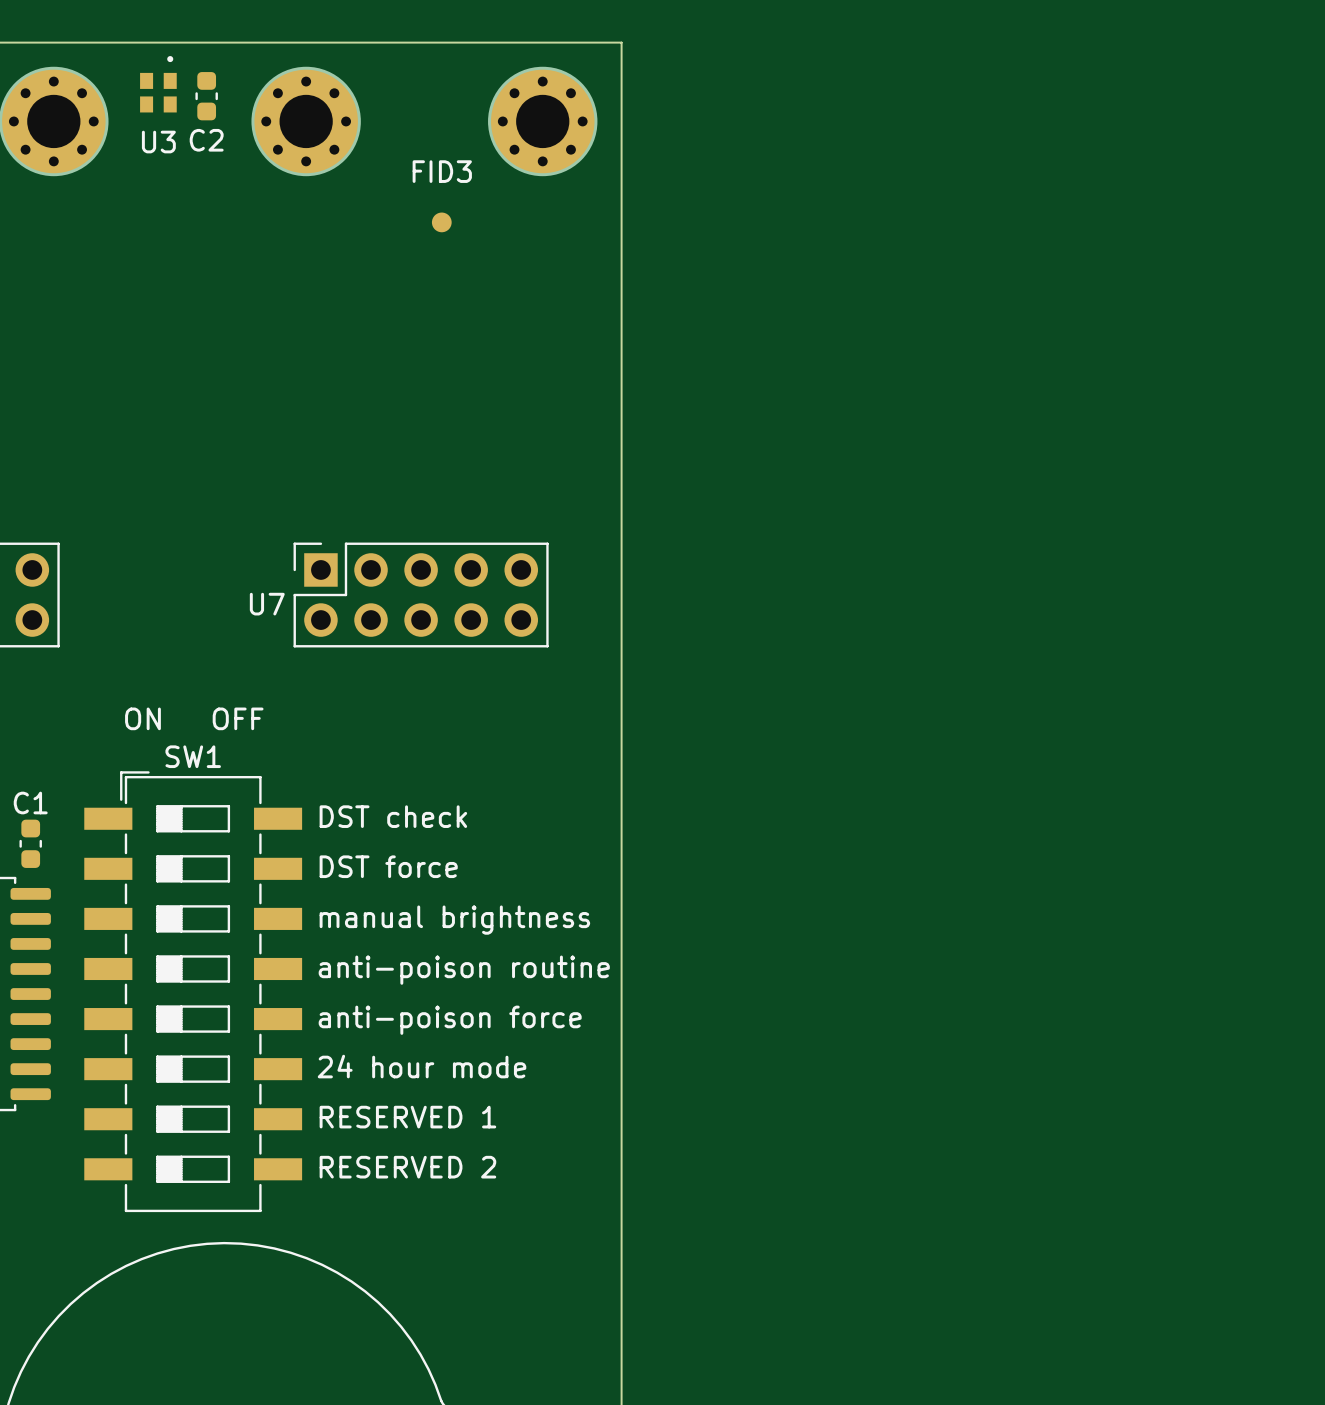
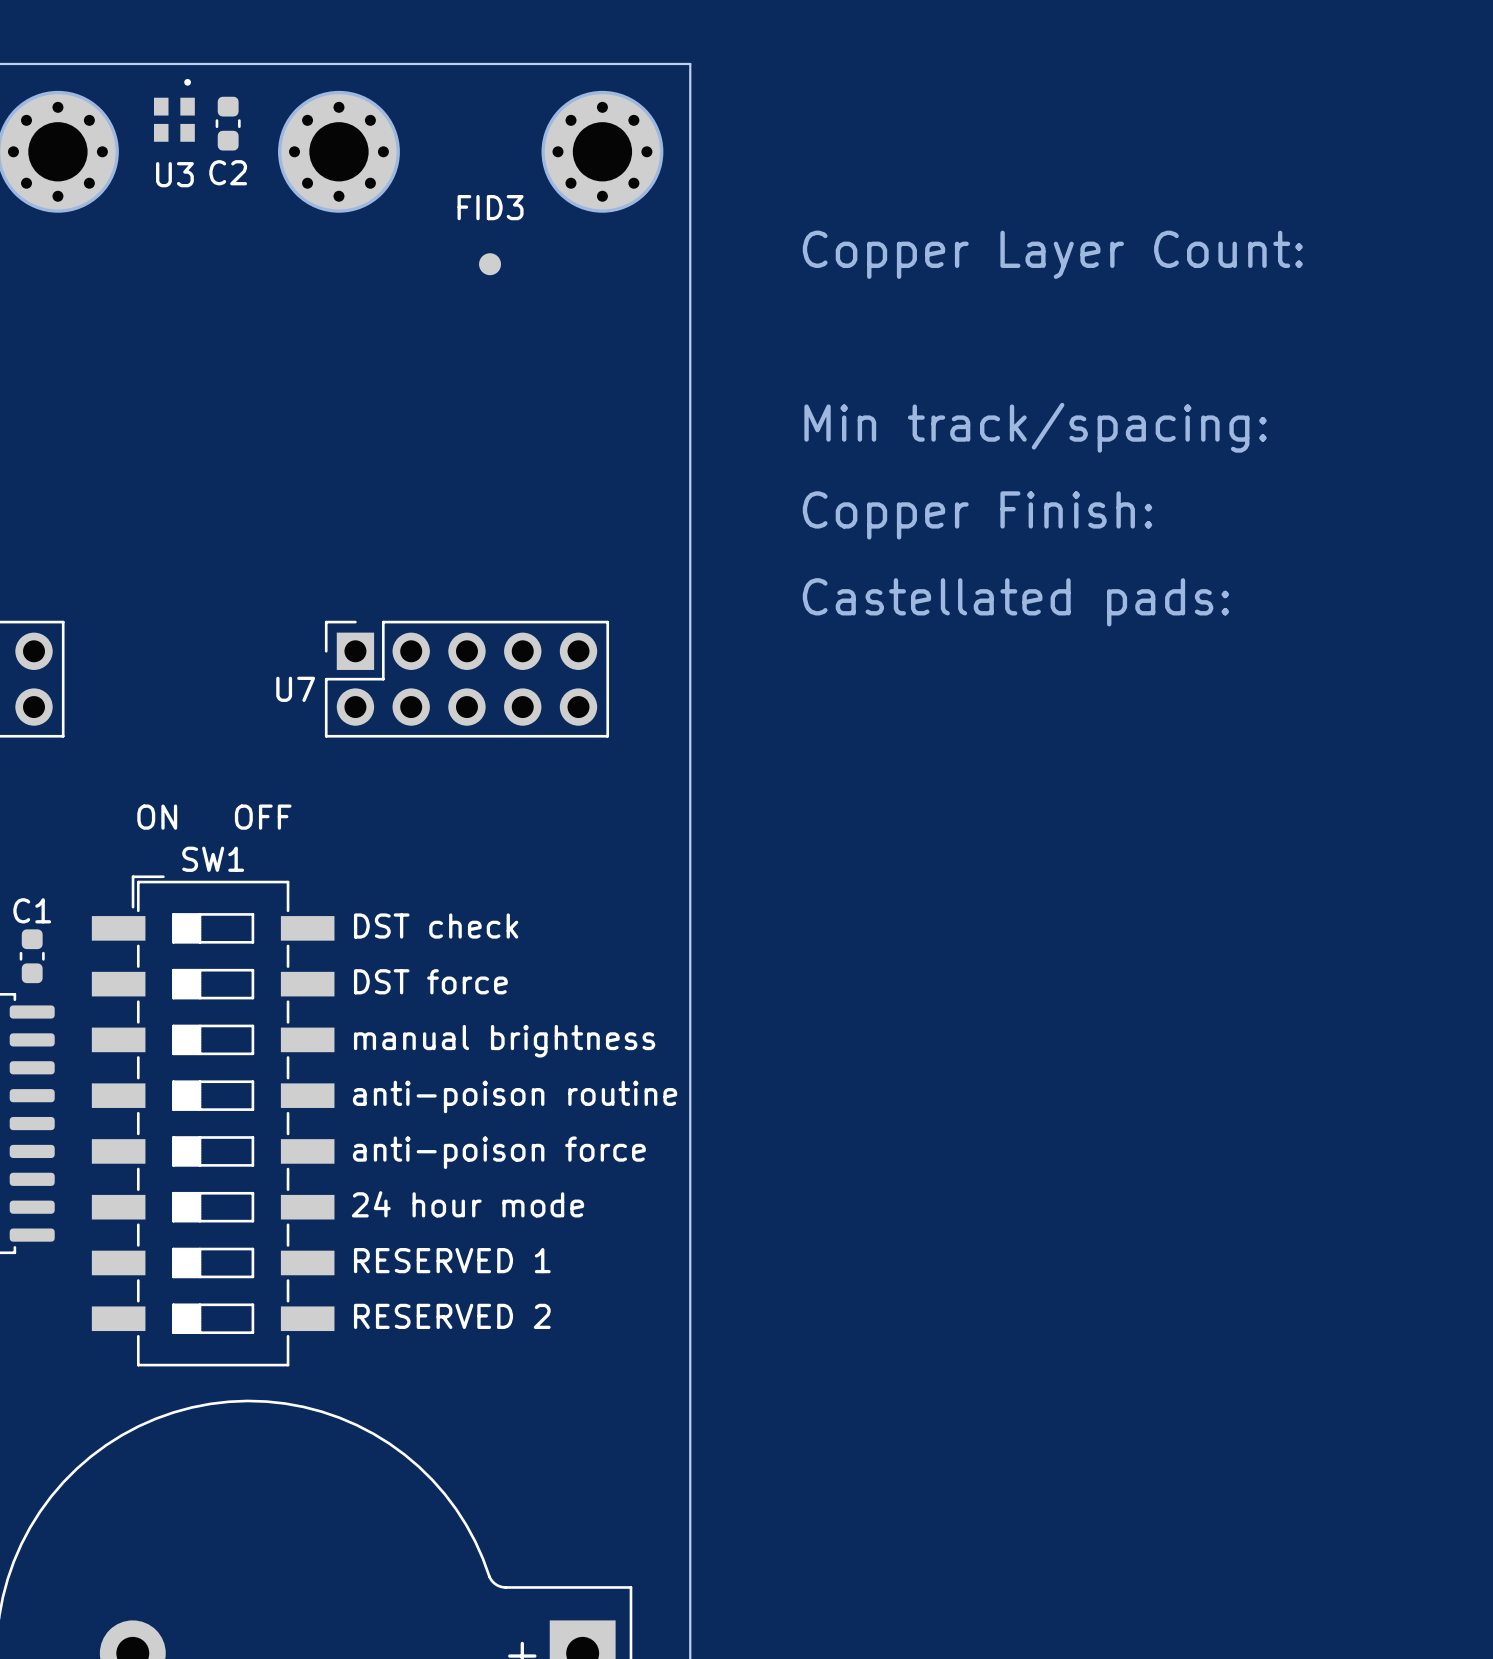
text: none -> Copper Layer Count: (1052, 254)
text: none -> Min track/spacing: (1035, 427)
text: none -> Copper Finish: (977, 515)
text: none -> Castellated pads: (1015, 602)

